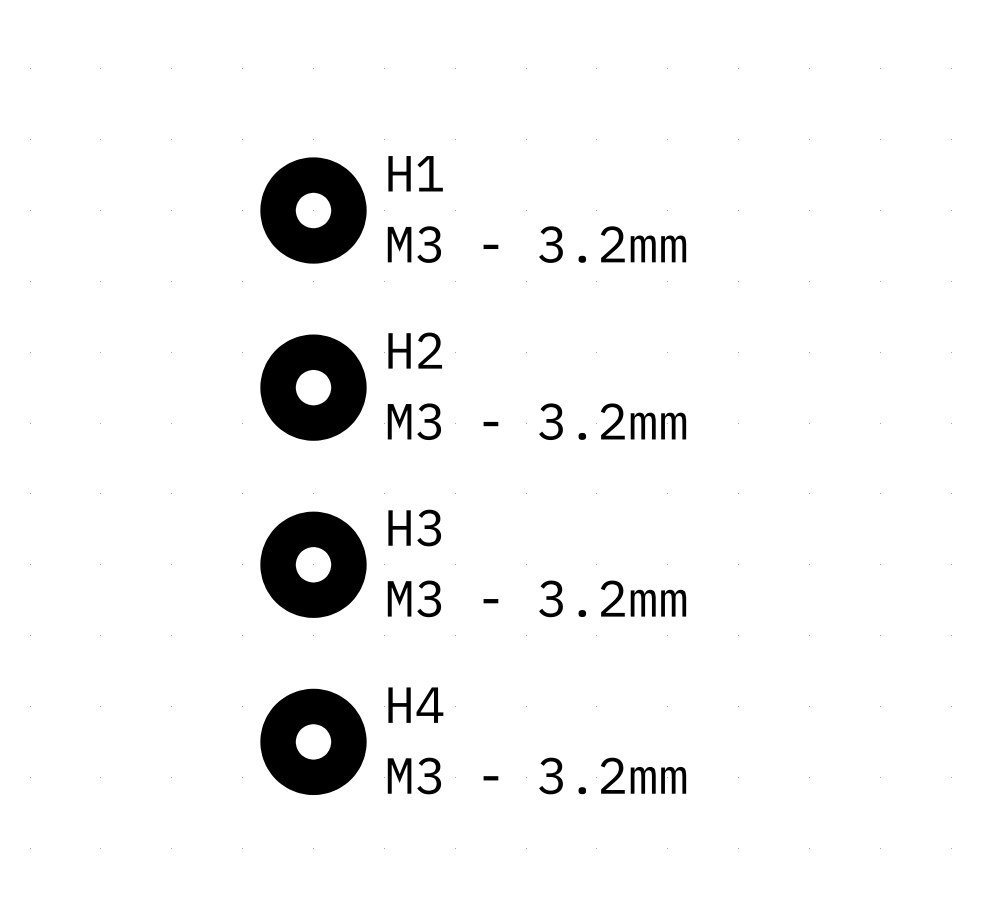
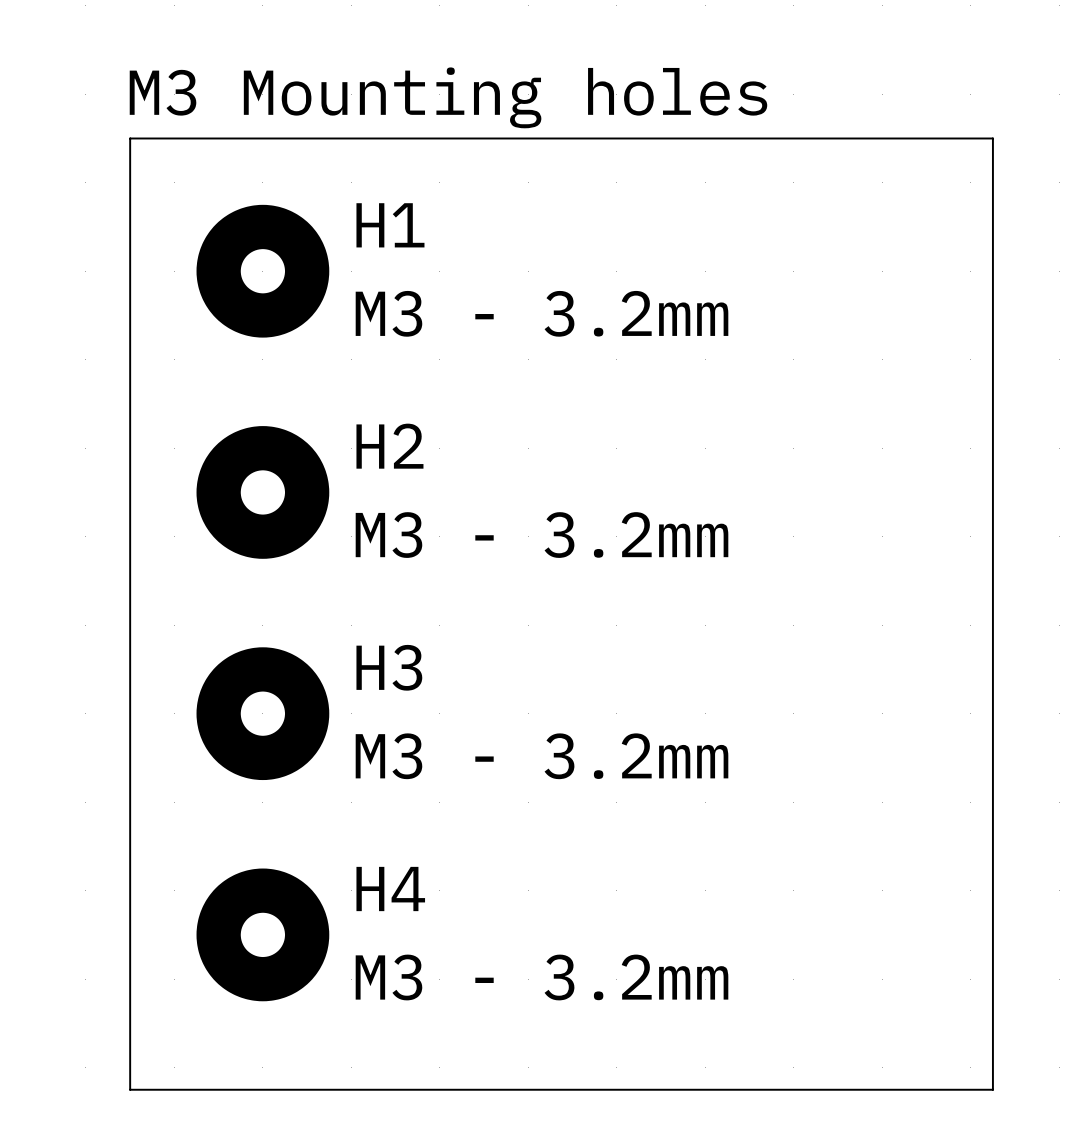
text: none -> M3 Mounting holes (448, 97)
line: none -> (130, 138) (992, 138) (992, 1089) (130, 1089) (130, 138)

